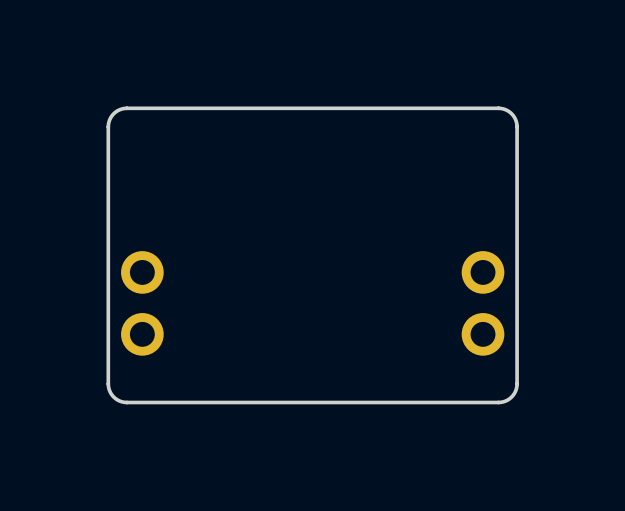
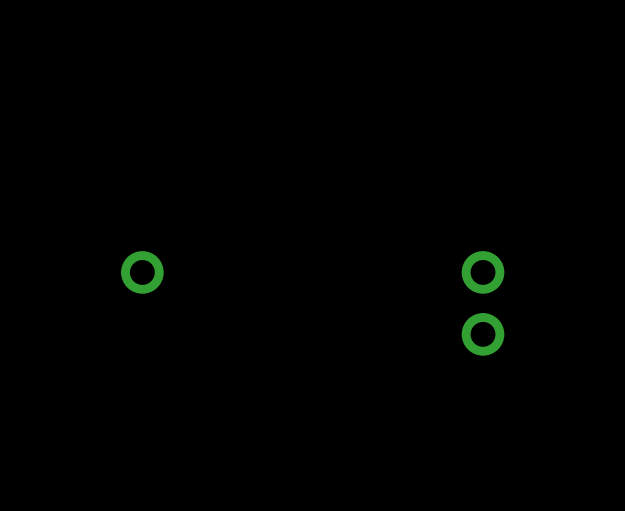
board edge: (498, 108) (126, 108) (115, 112) (109, 119) (108, 126) (108, 383) (112, 395) (119, 401) (126, 402) (498, 402) (509, 398) (515, 391) (517, 383) (517, 126) (511, 113) (498, 108) -> none
part: (142, 334) -> none

